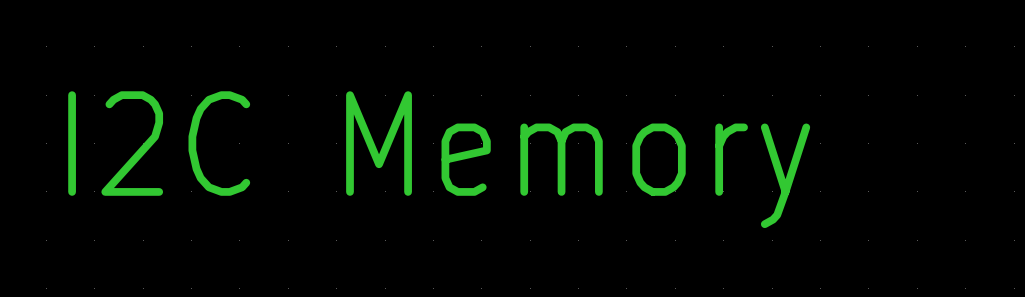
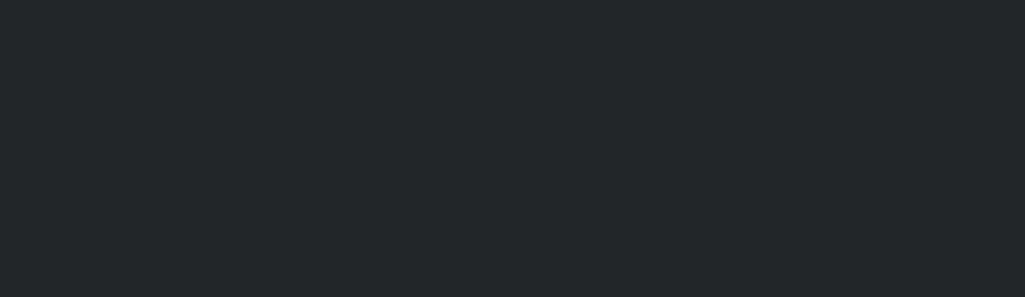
text: I2C Memory (439, 159) -> none

